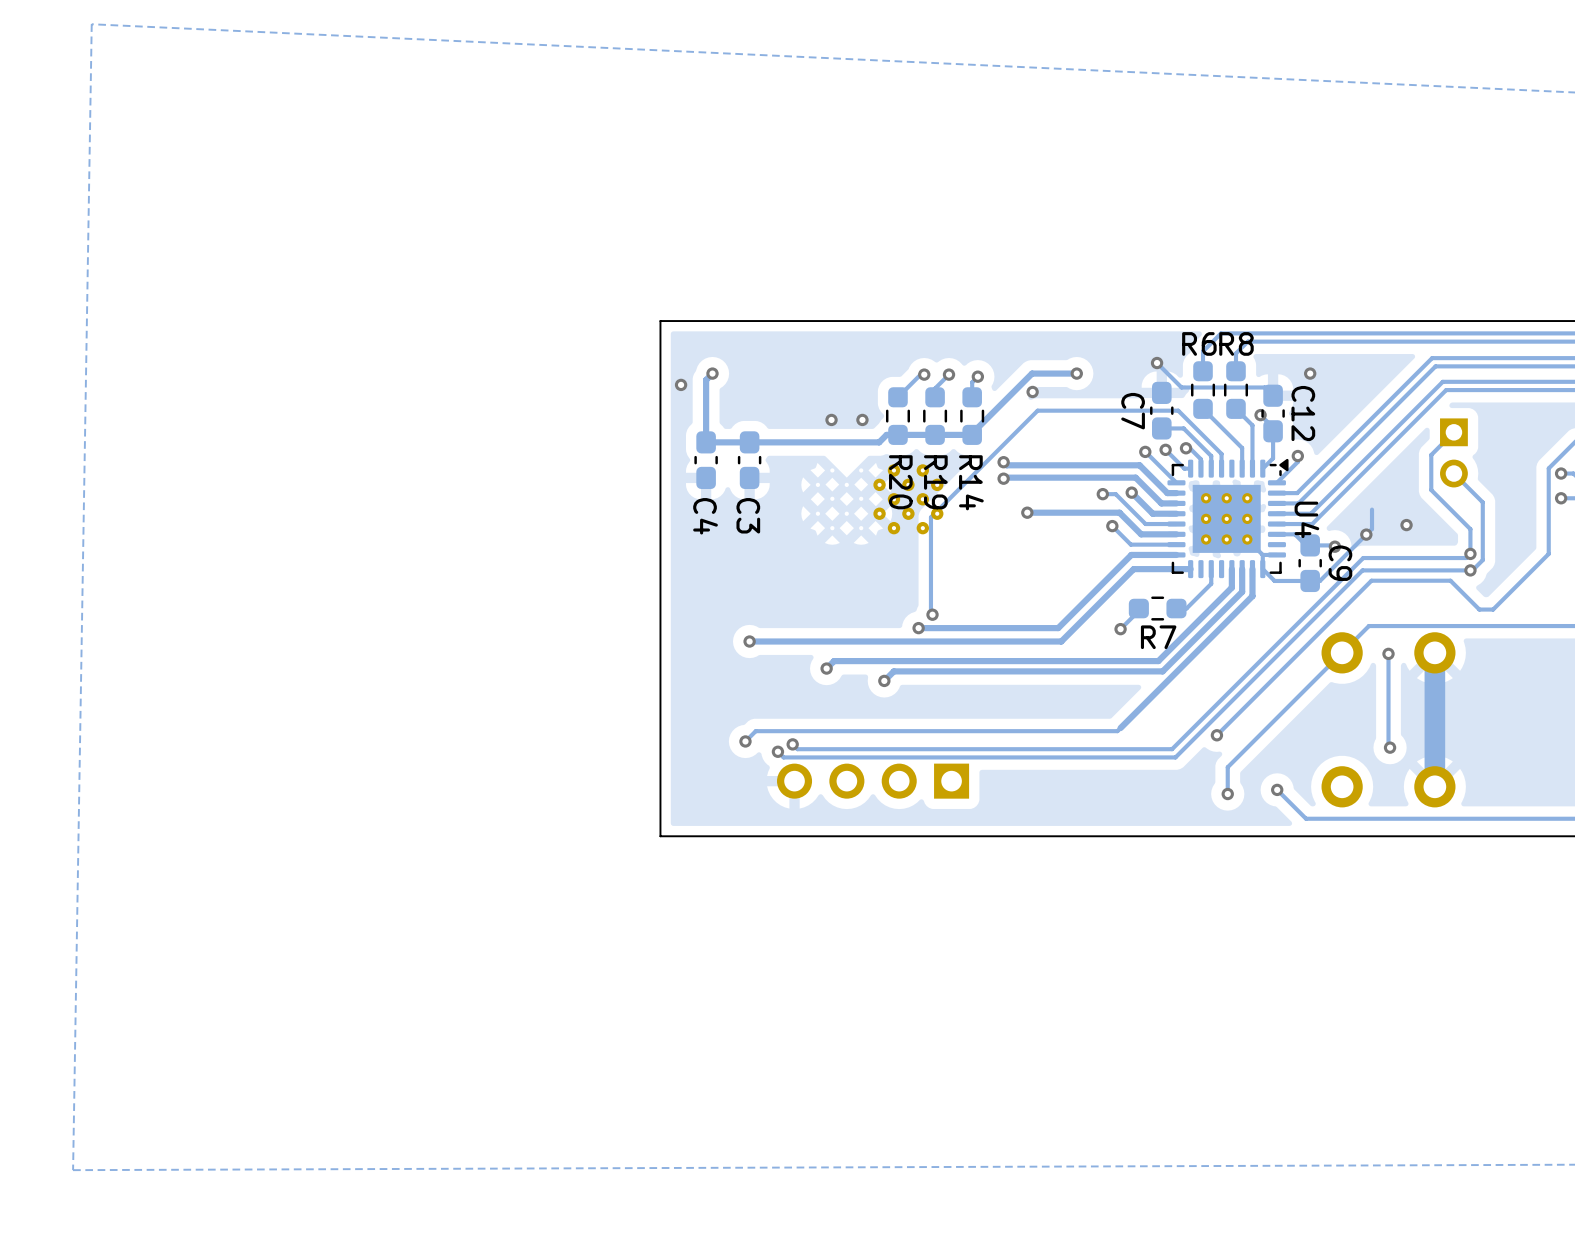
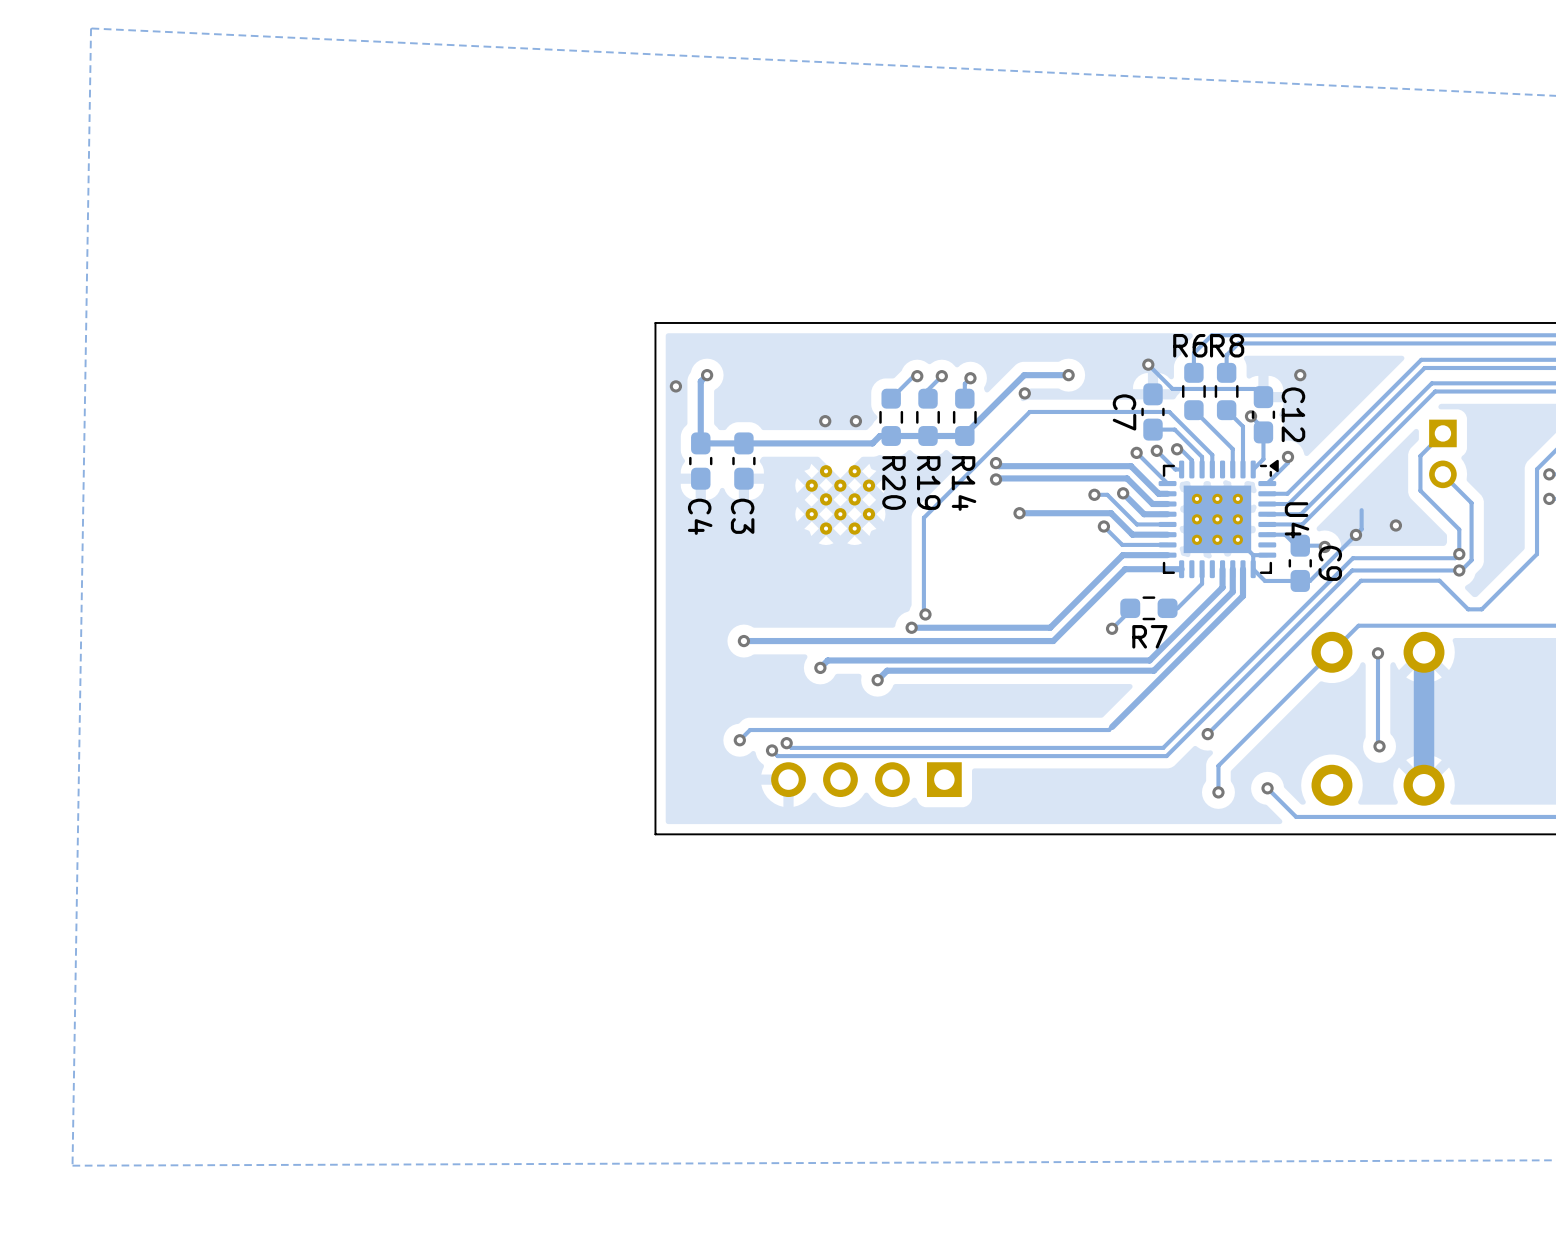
part: none -> (840, 499)
part: (908, 499) -> none

